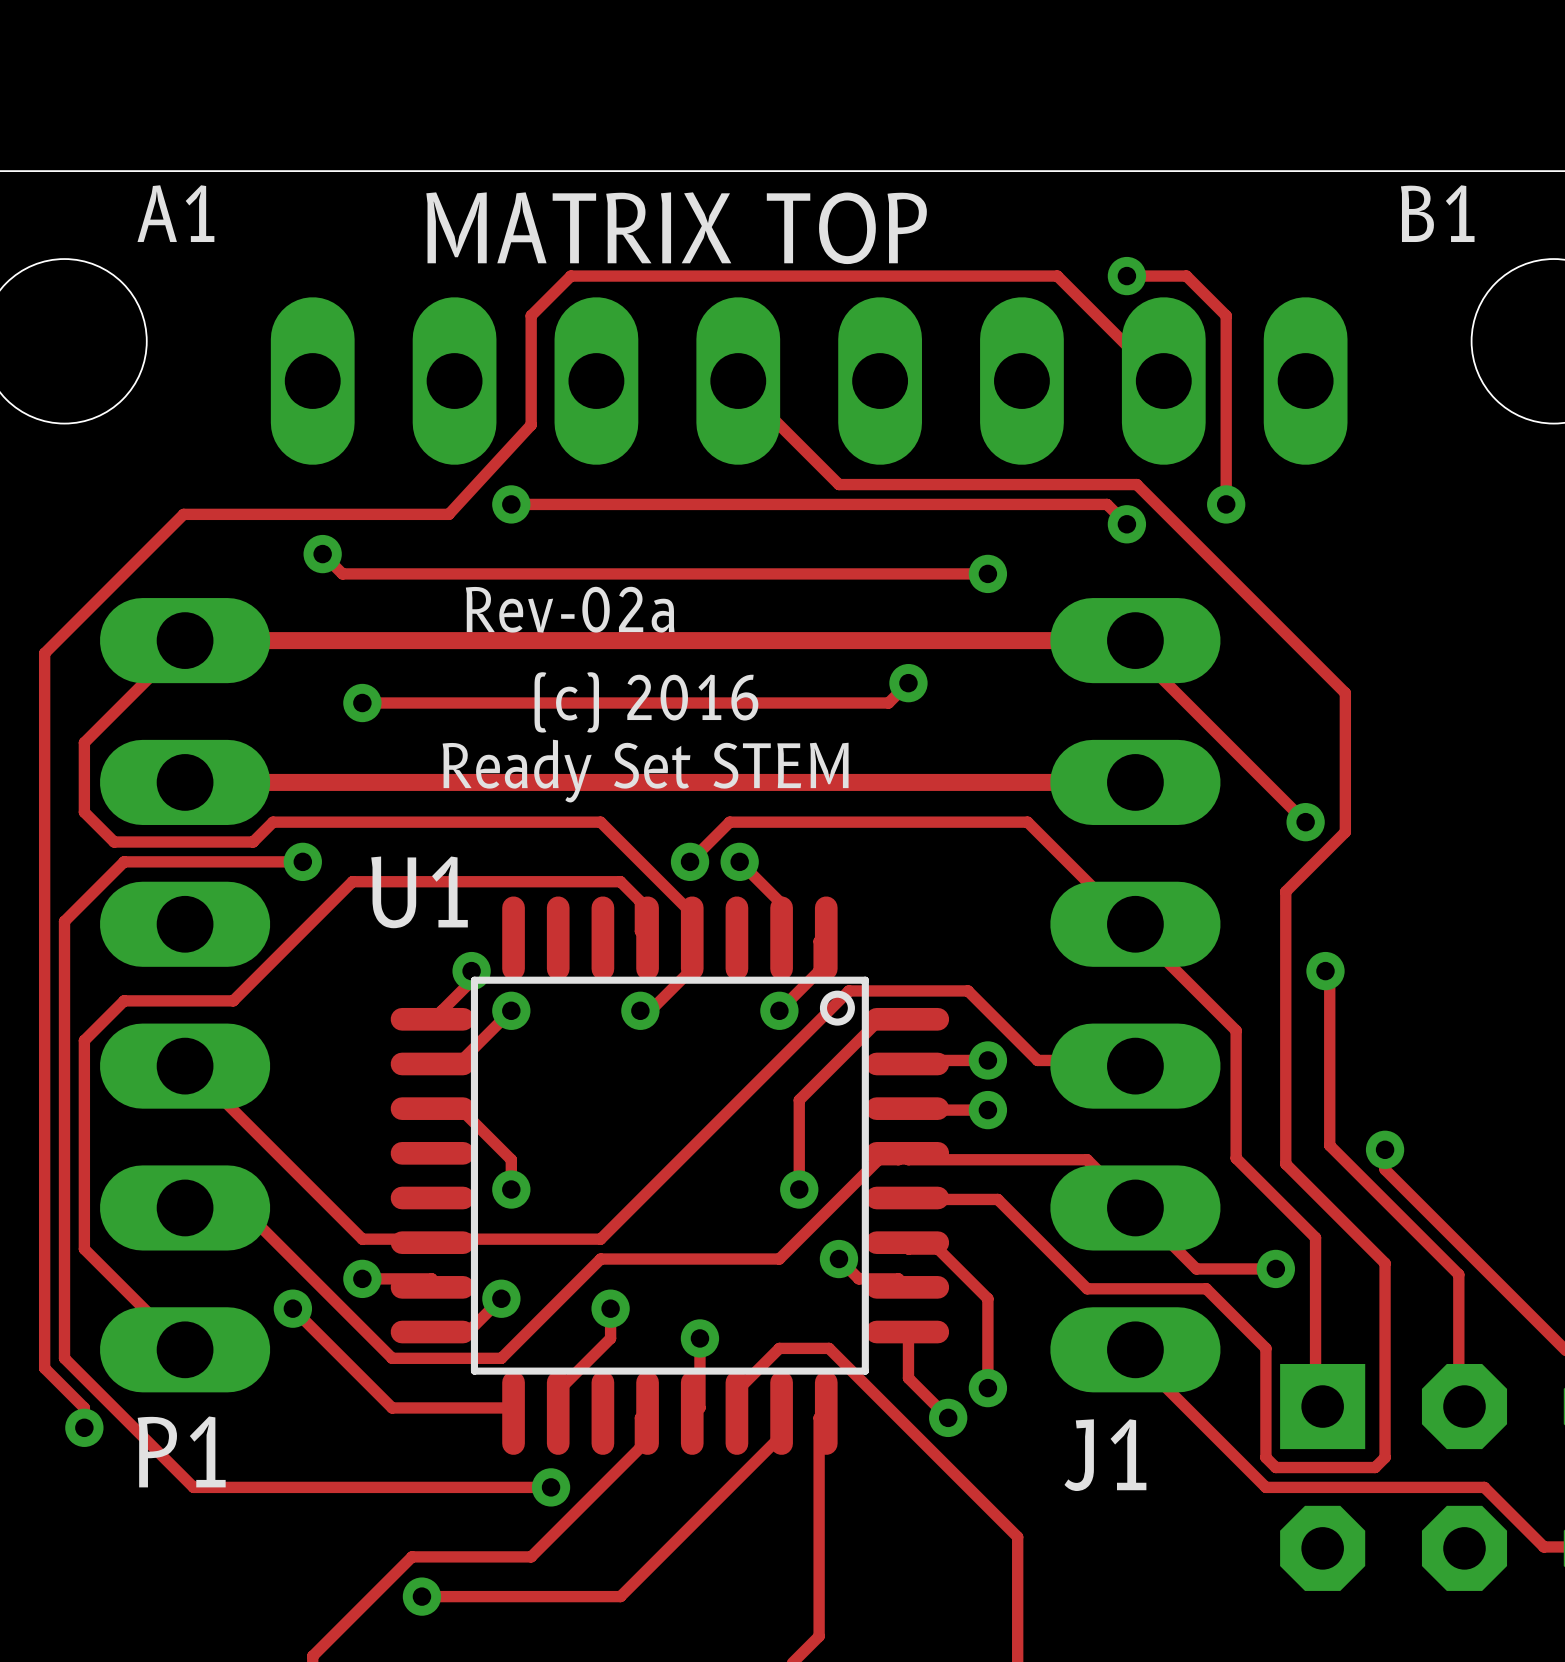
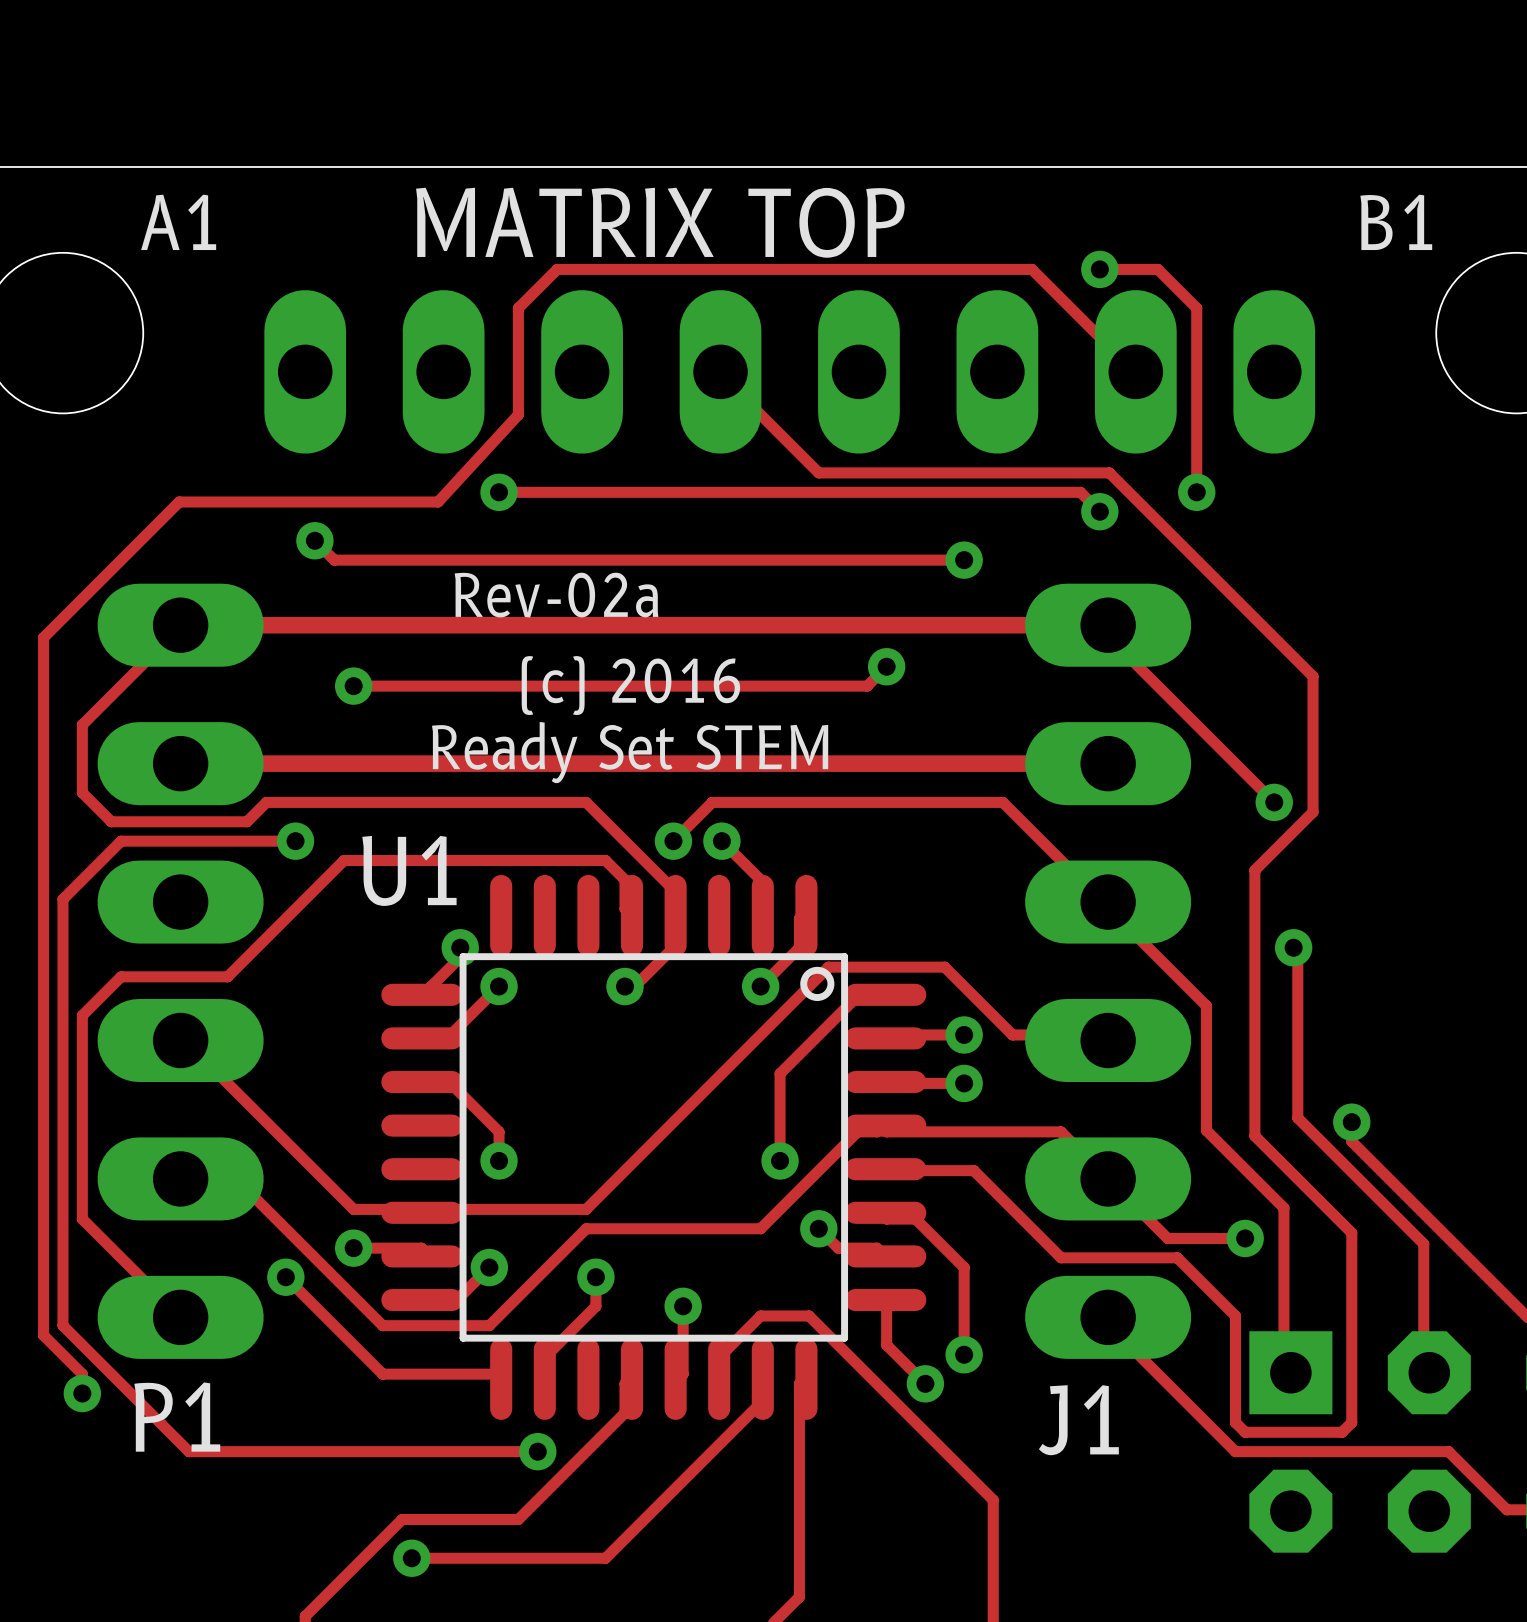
text position: A1 (175, 213) -> A1 (178, 222)
text position: B1 (1437, 213) -> B1 (1396, 222)

